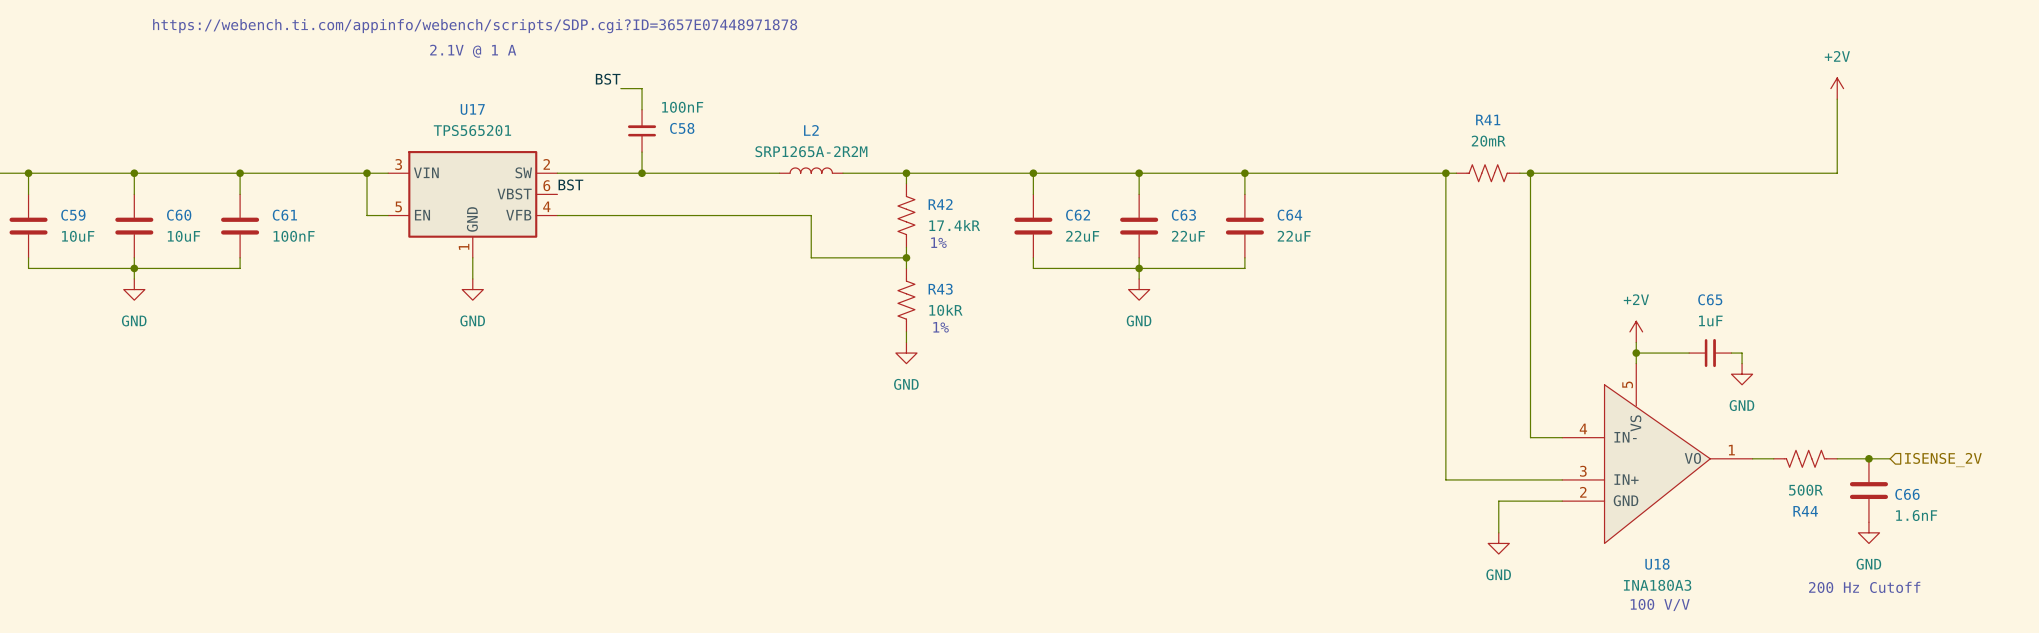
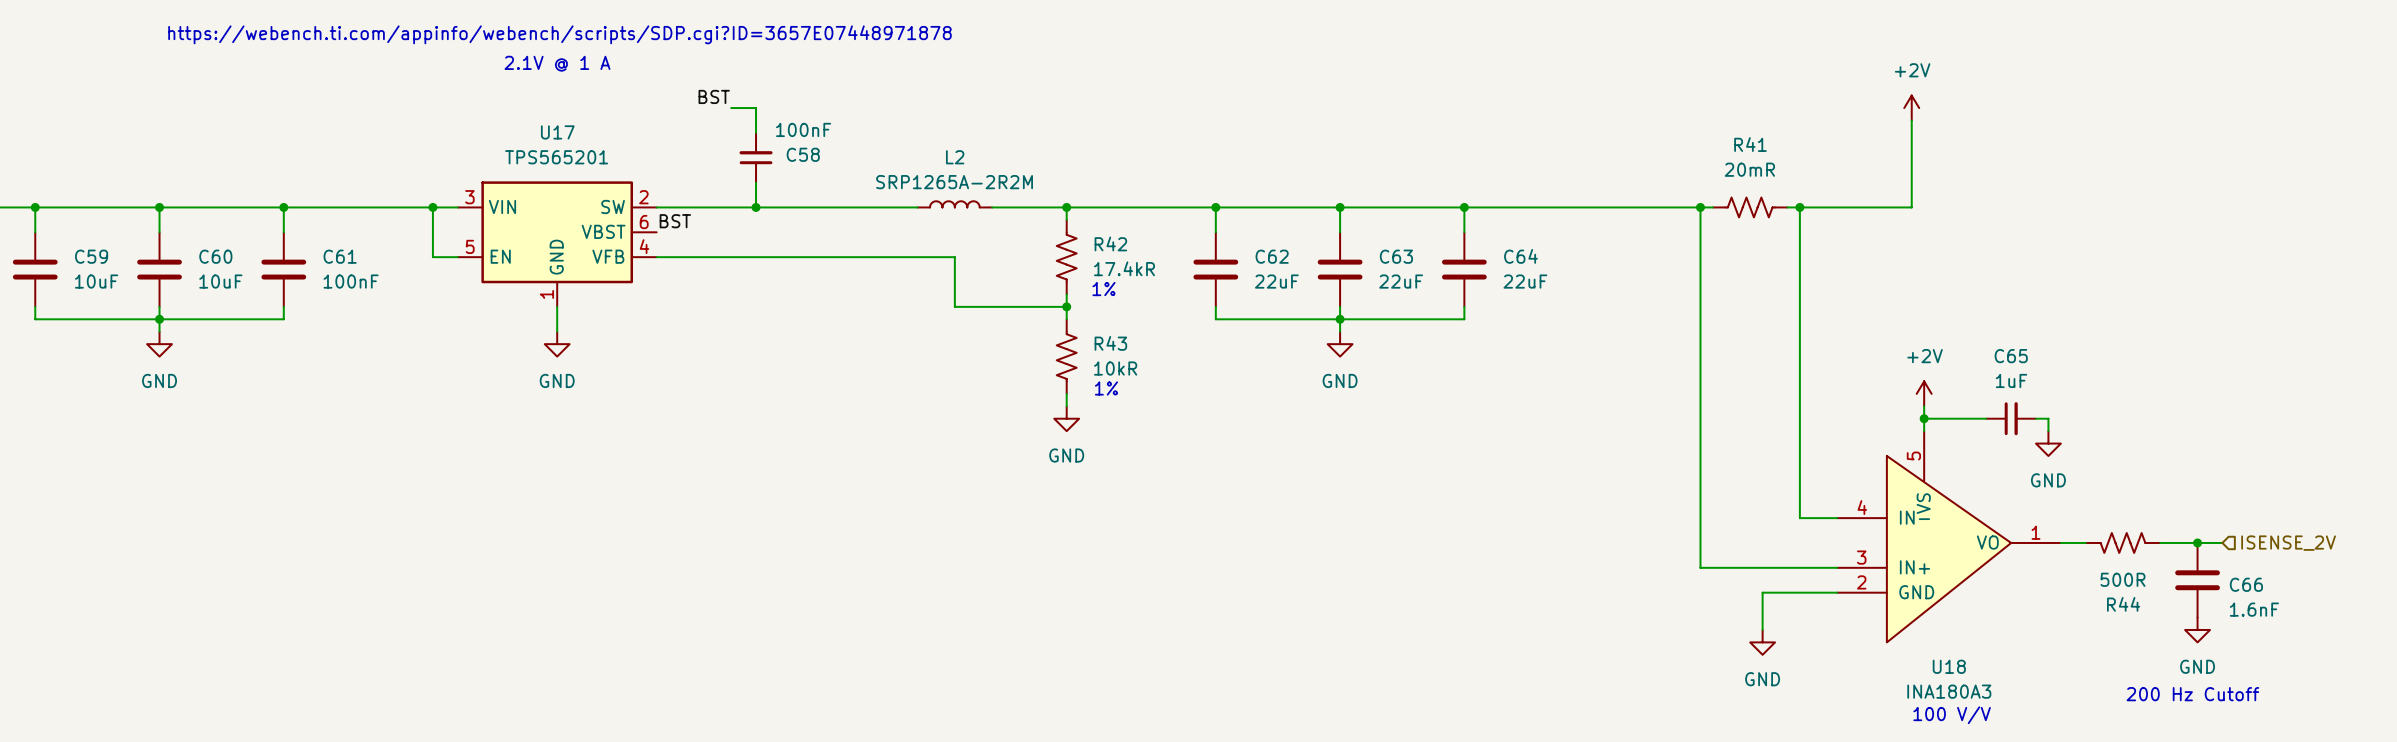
power symbol: none -> +2V (1911, 108)
power symbol: +2V (1837, 88) -> none
wire: (1837, 99) (1837, 173) (1625, 173) -> (1911, 120) (1911, 207)

